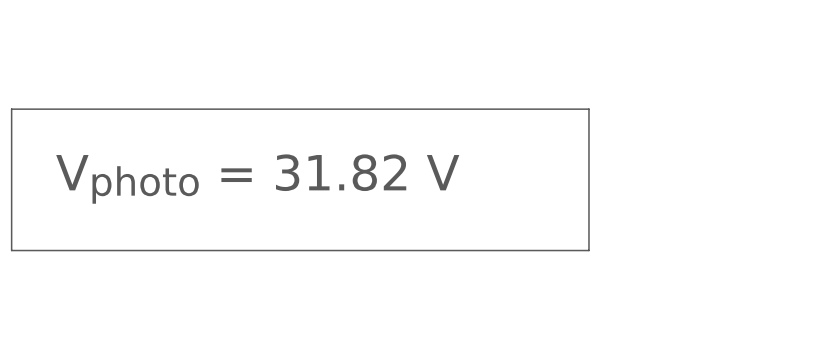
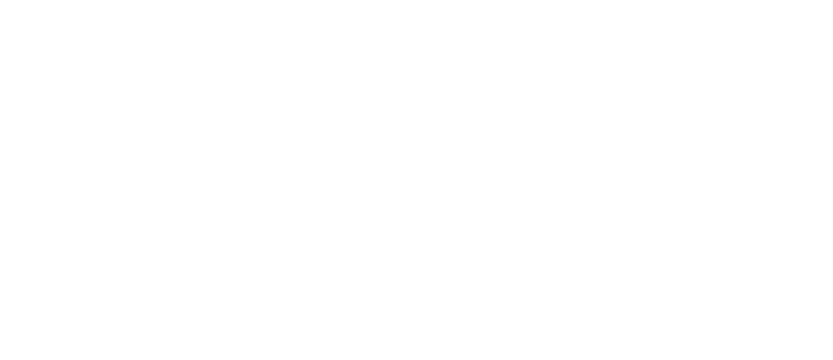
line: (11, 109) (588, 109) (588, 250) (11, 250) (11, 109) -> none
text: Vphoto = 31.82 V (257, 179) -> none

